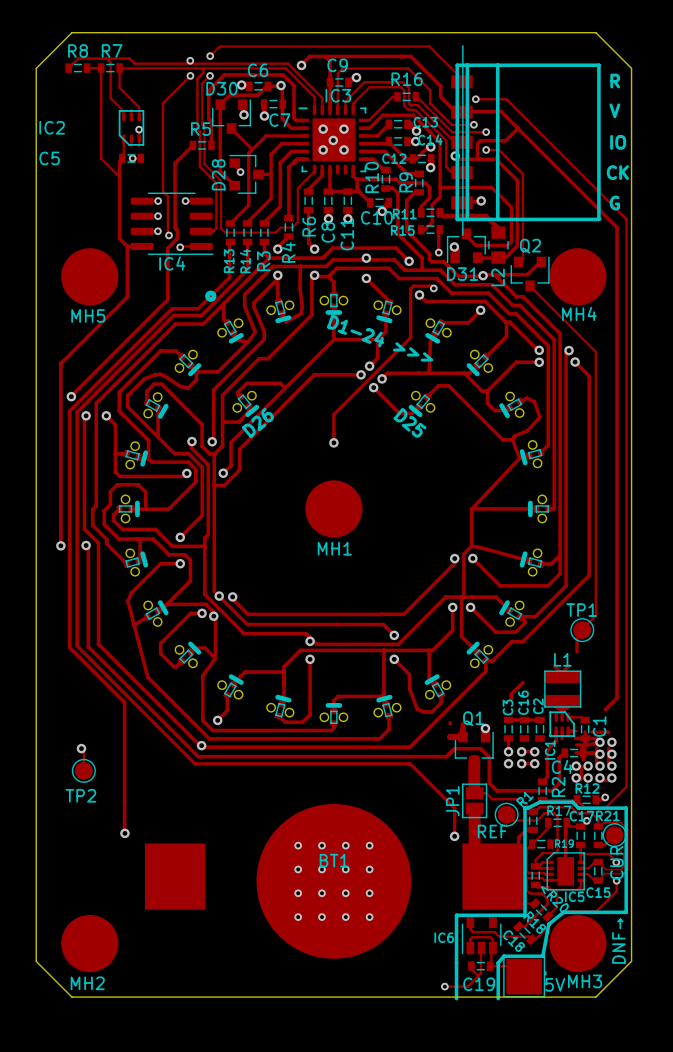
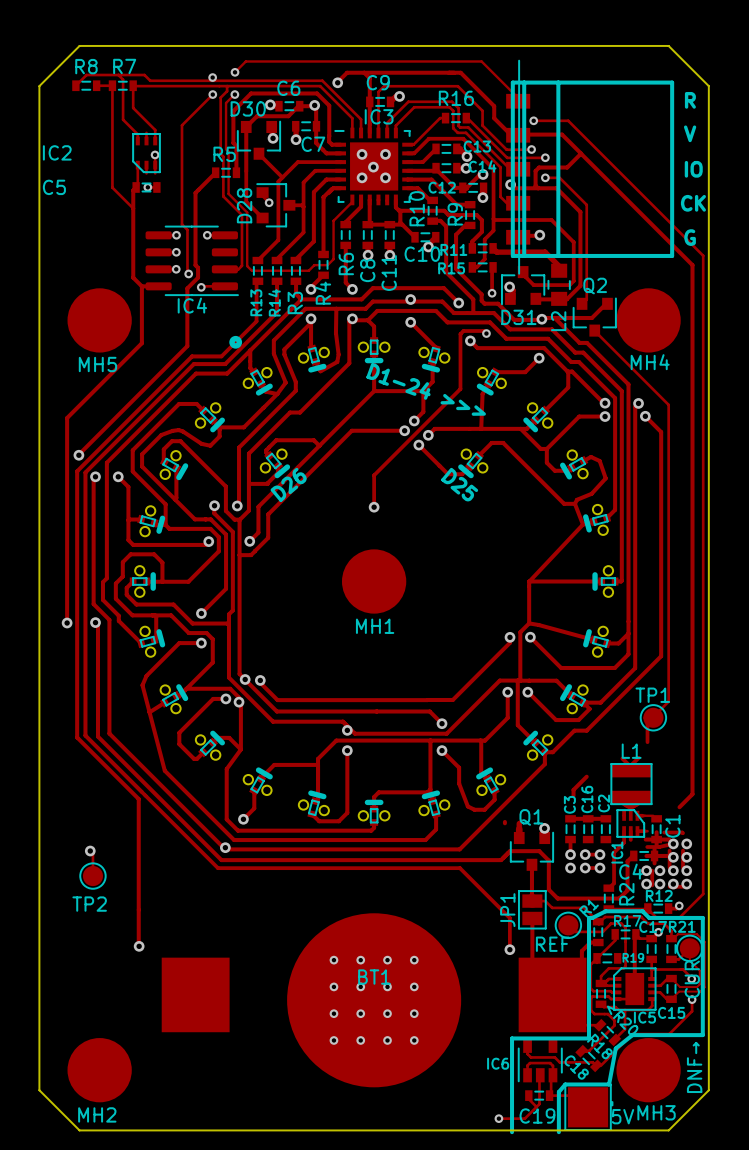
track: (450, 737) (462, 737) -> none
track width: thick (474, 760) (474, 792) -> thin (531, 864) (531, 900)
track width: thick (474, 808) (474, 858) -> thin (532, 918) (532, 974)

